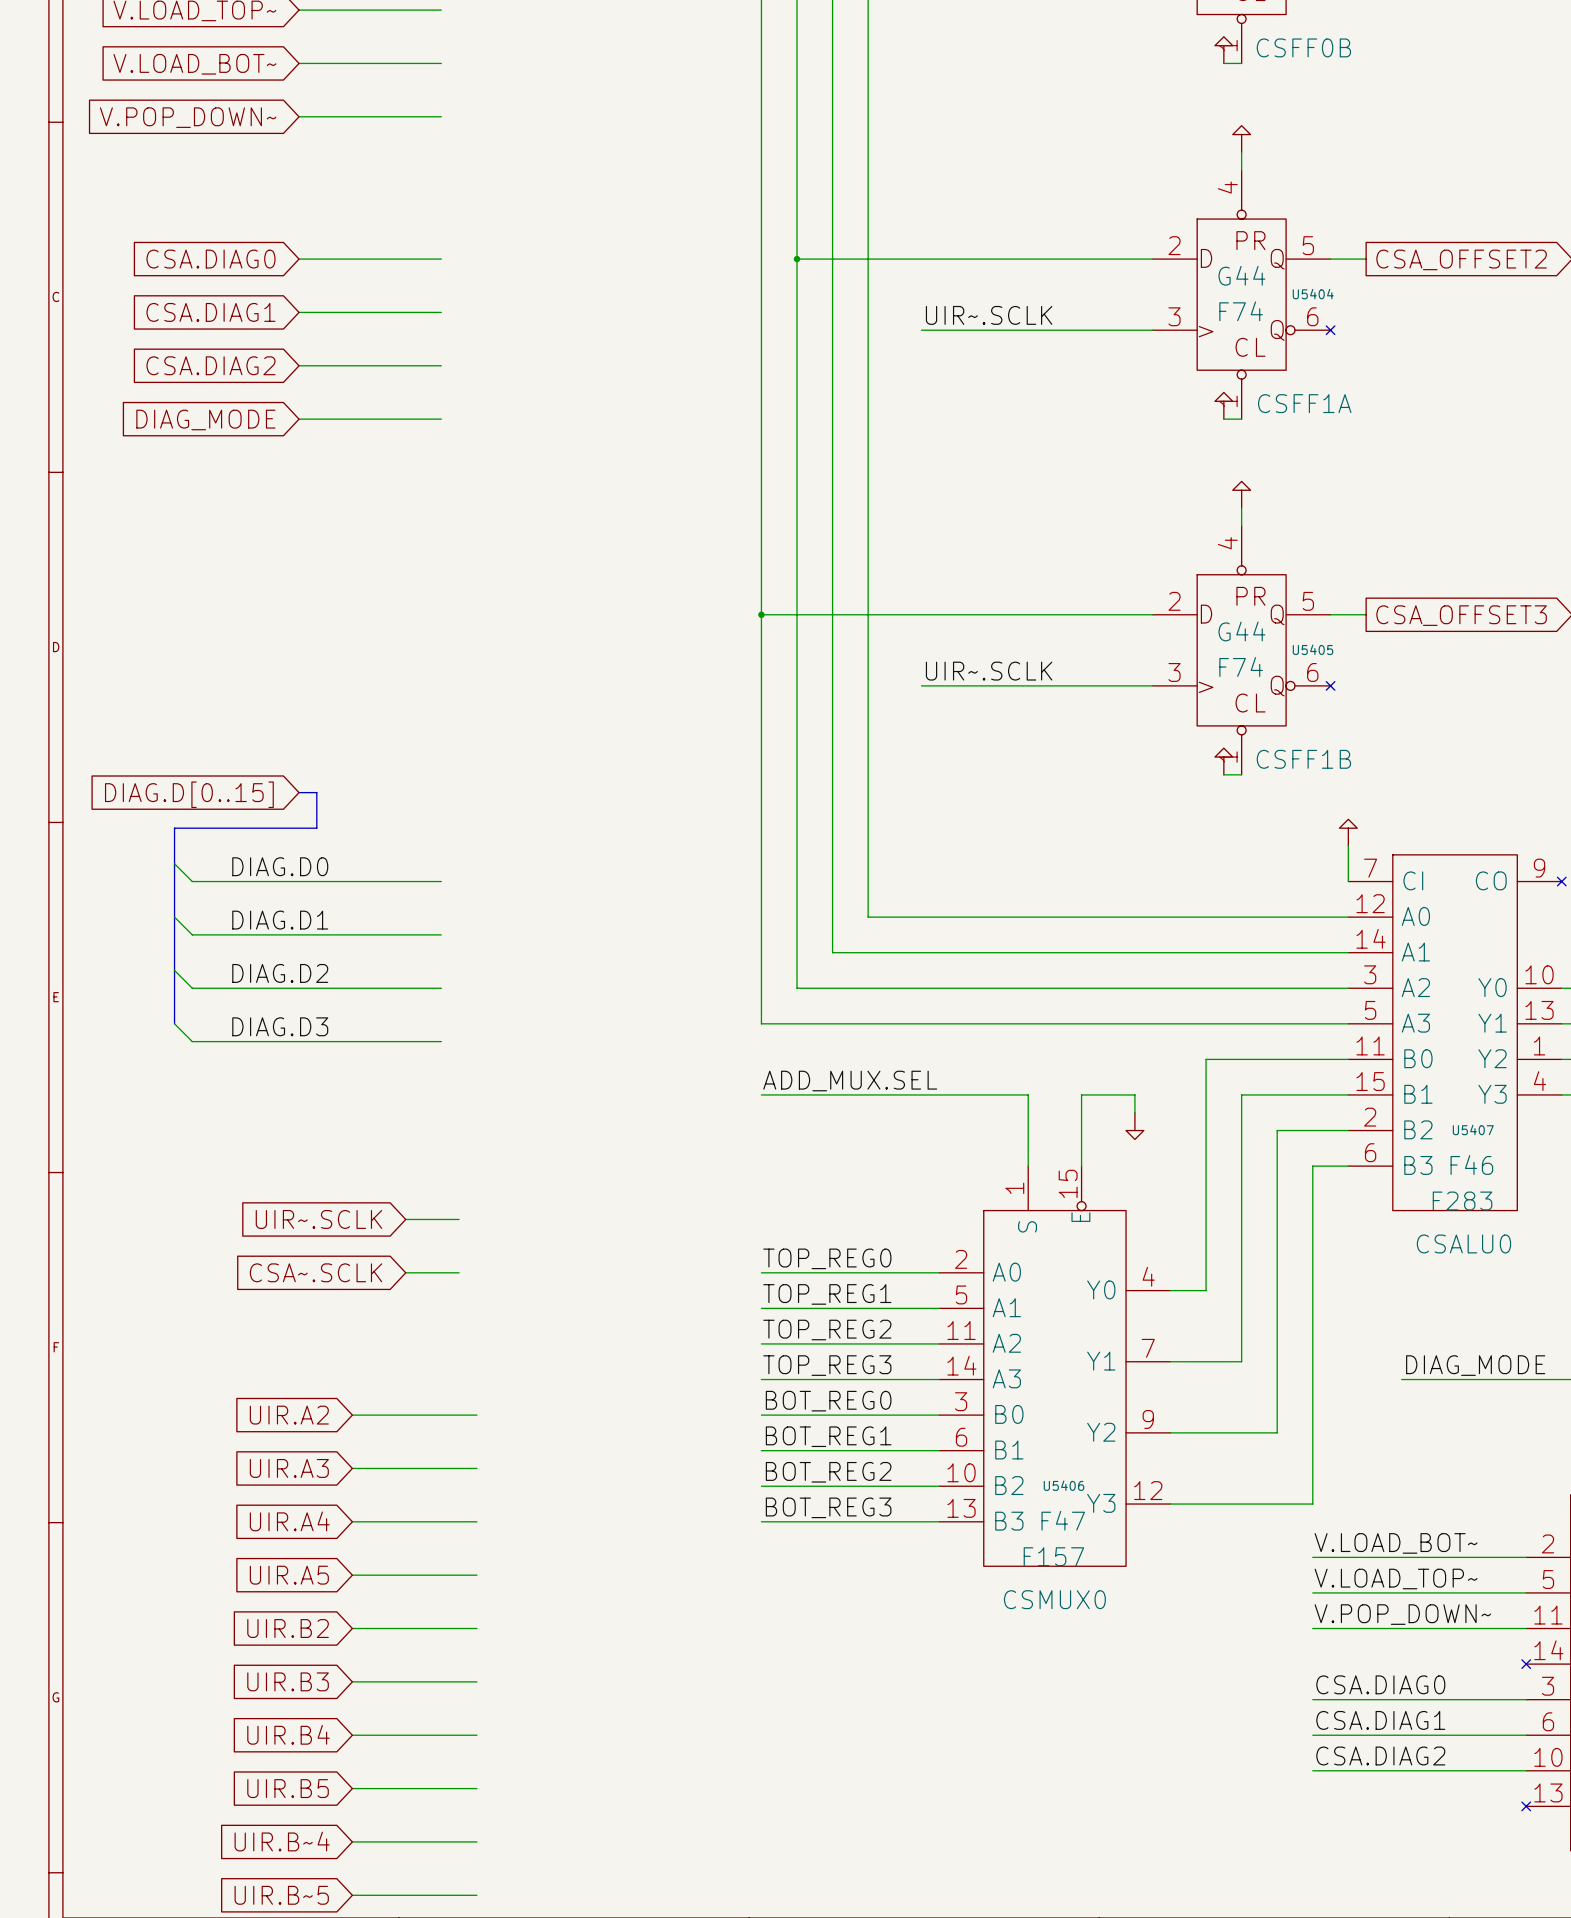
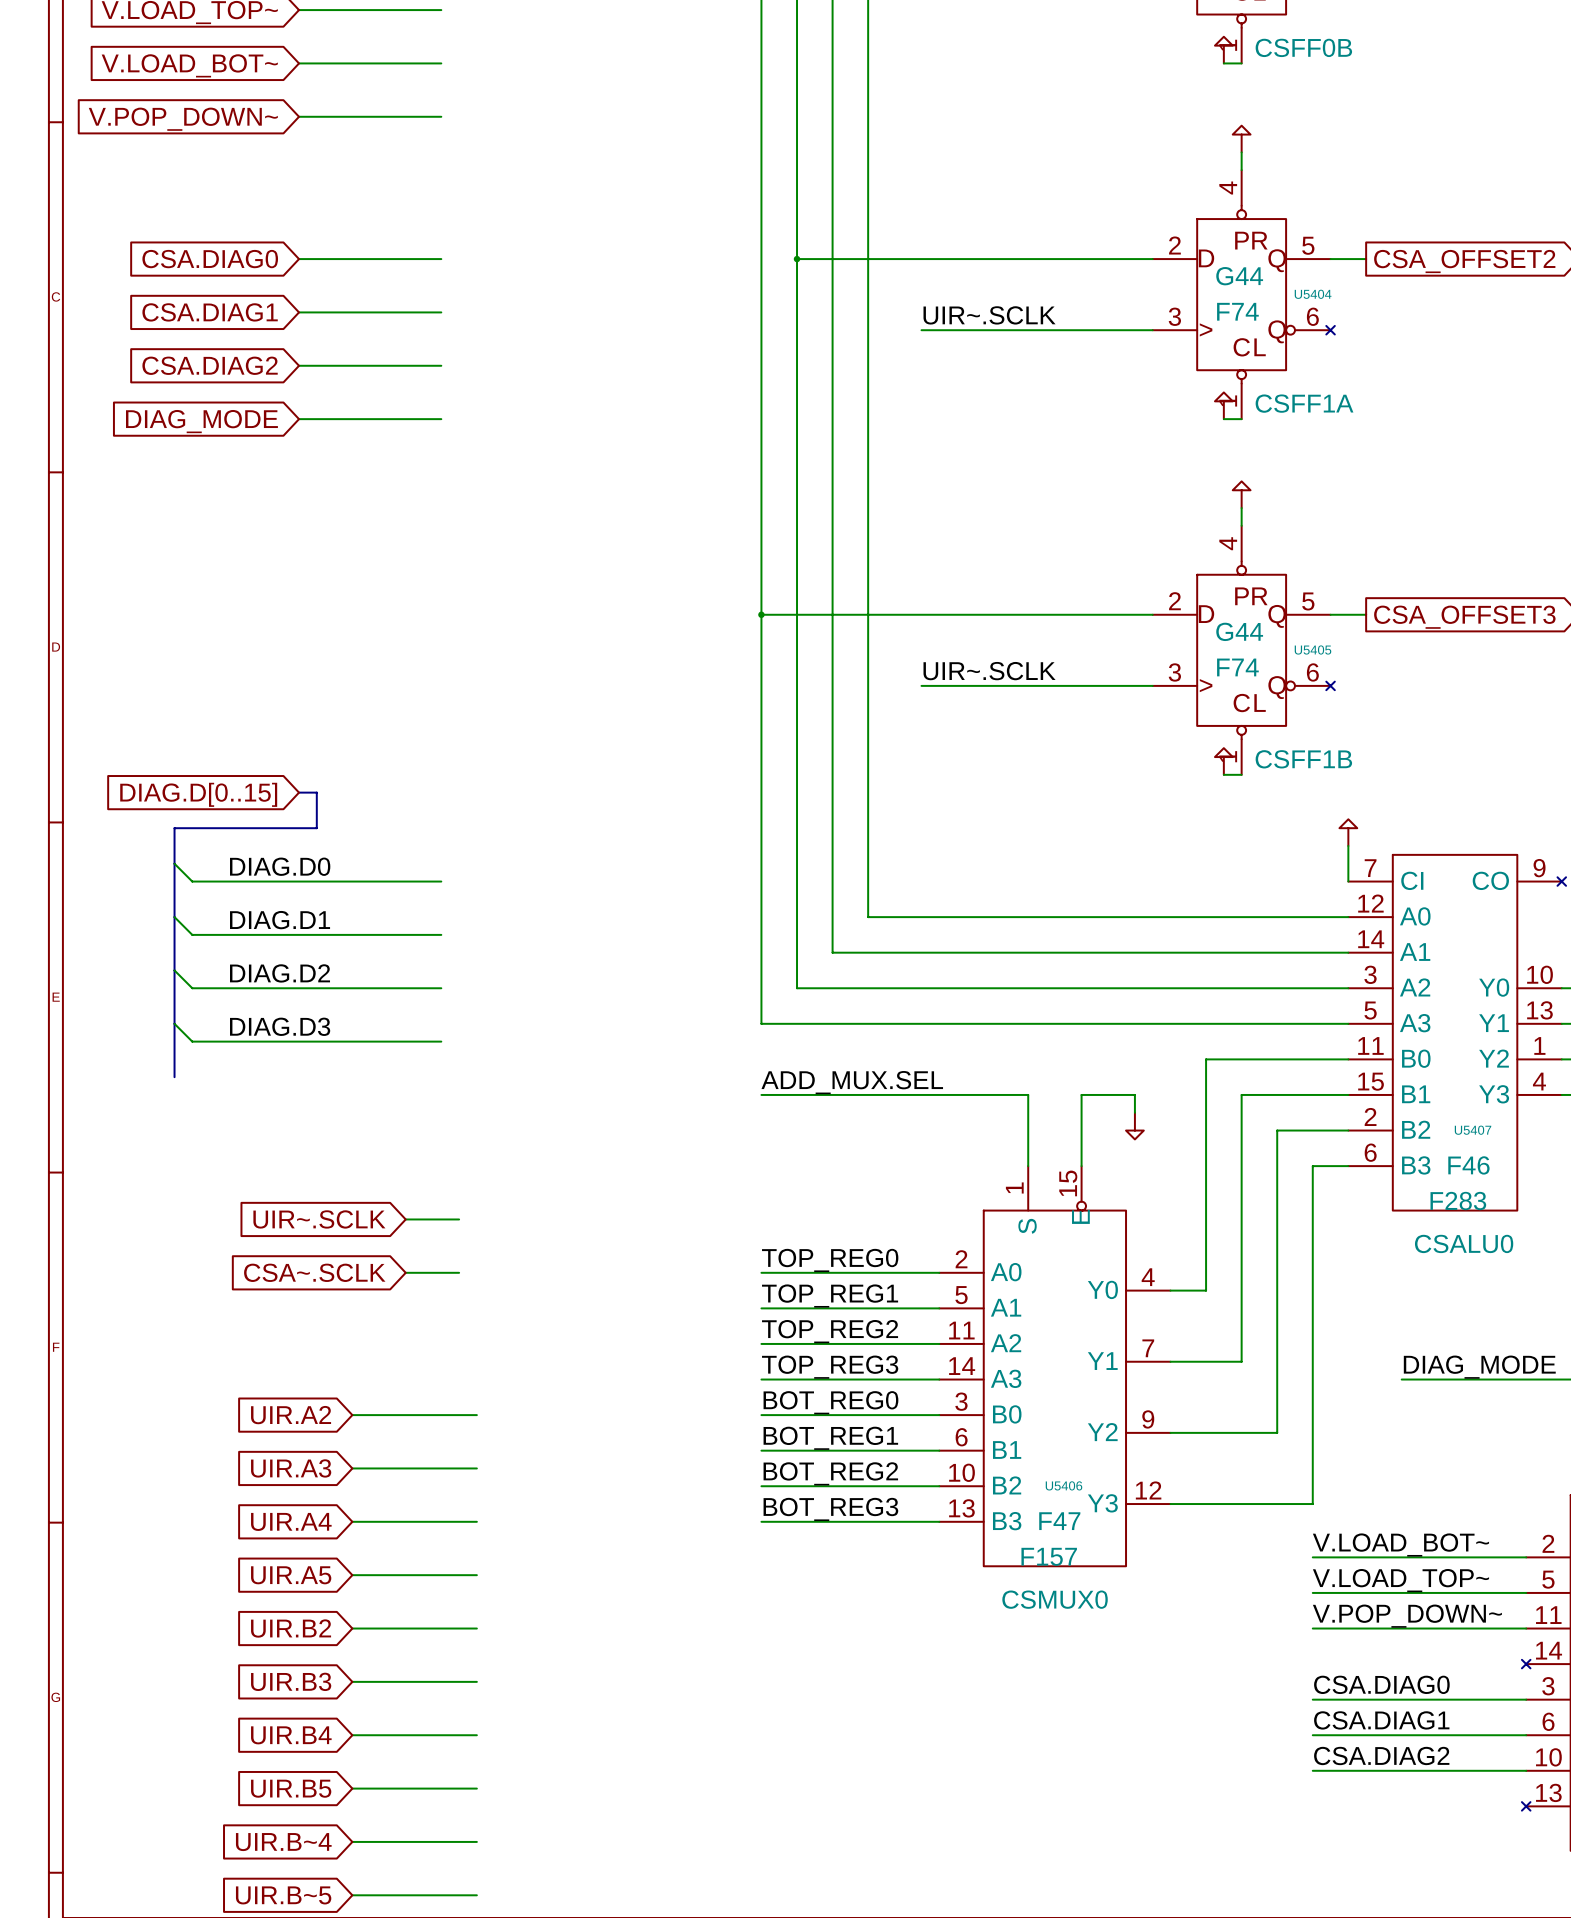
bus: none -> (174, 1023) (174, 1077)

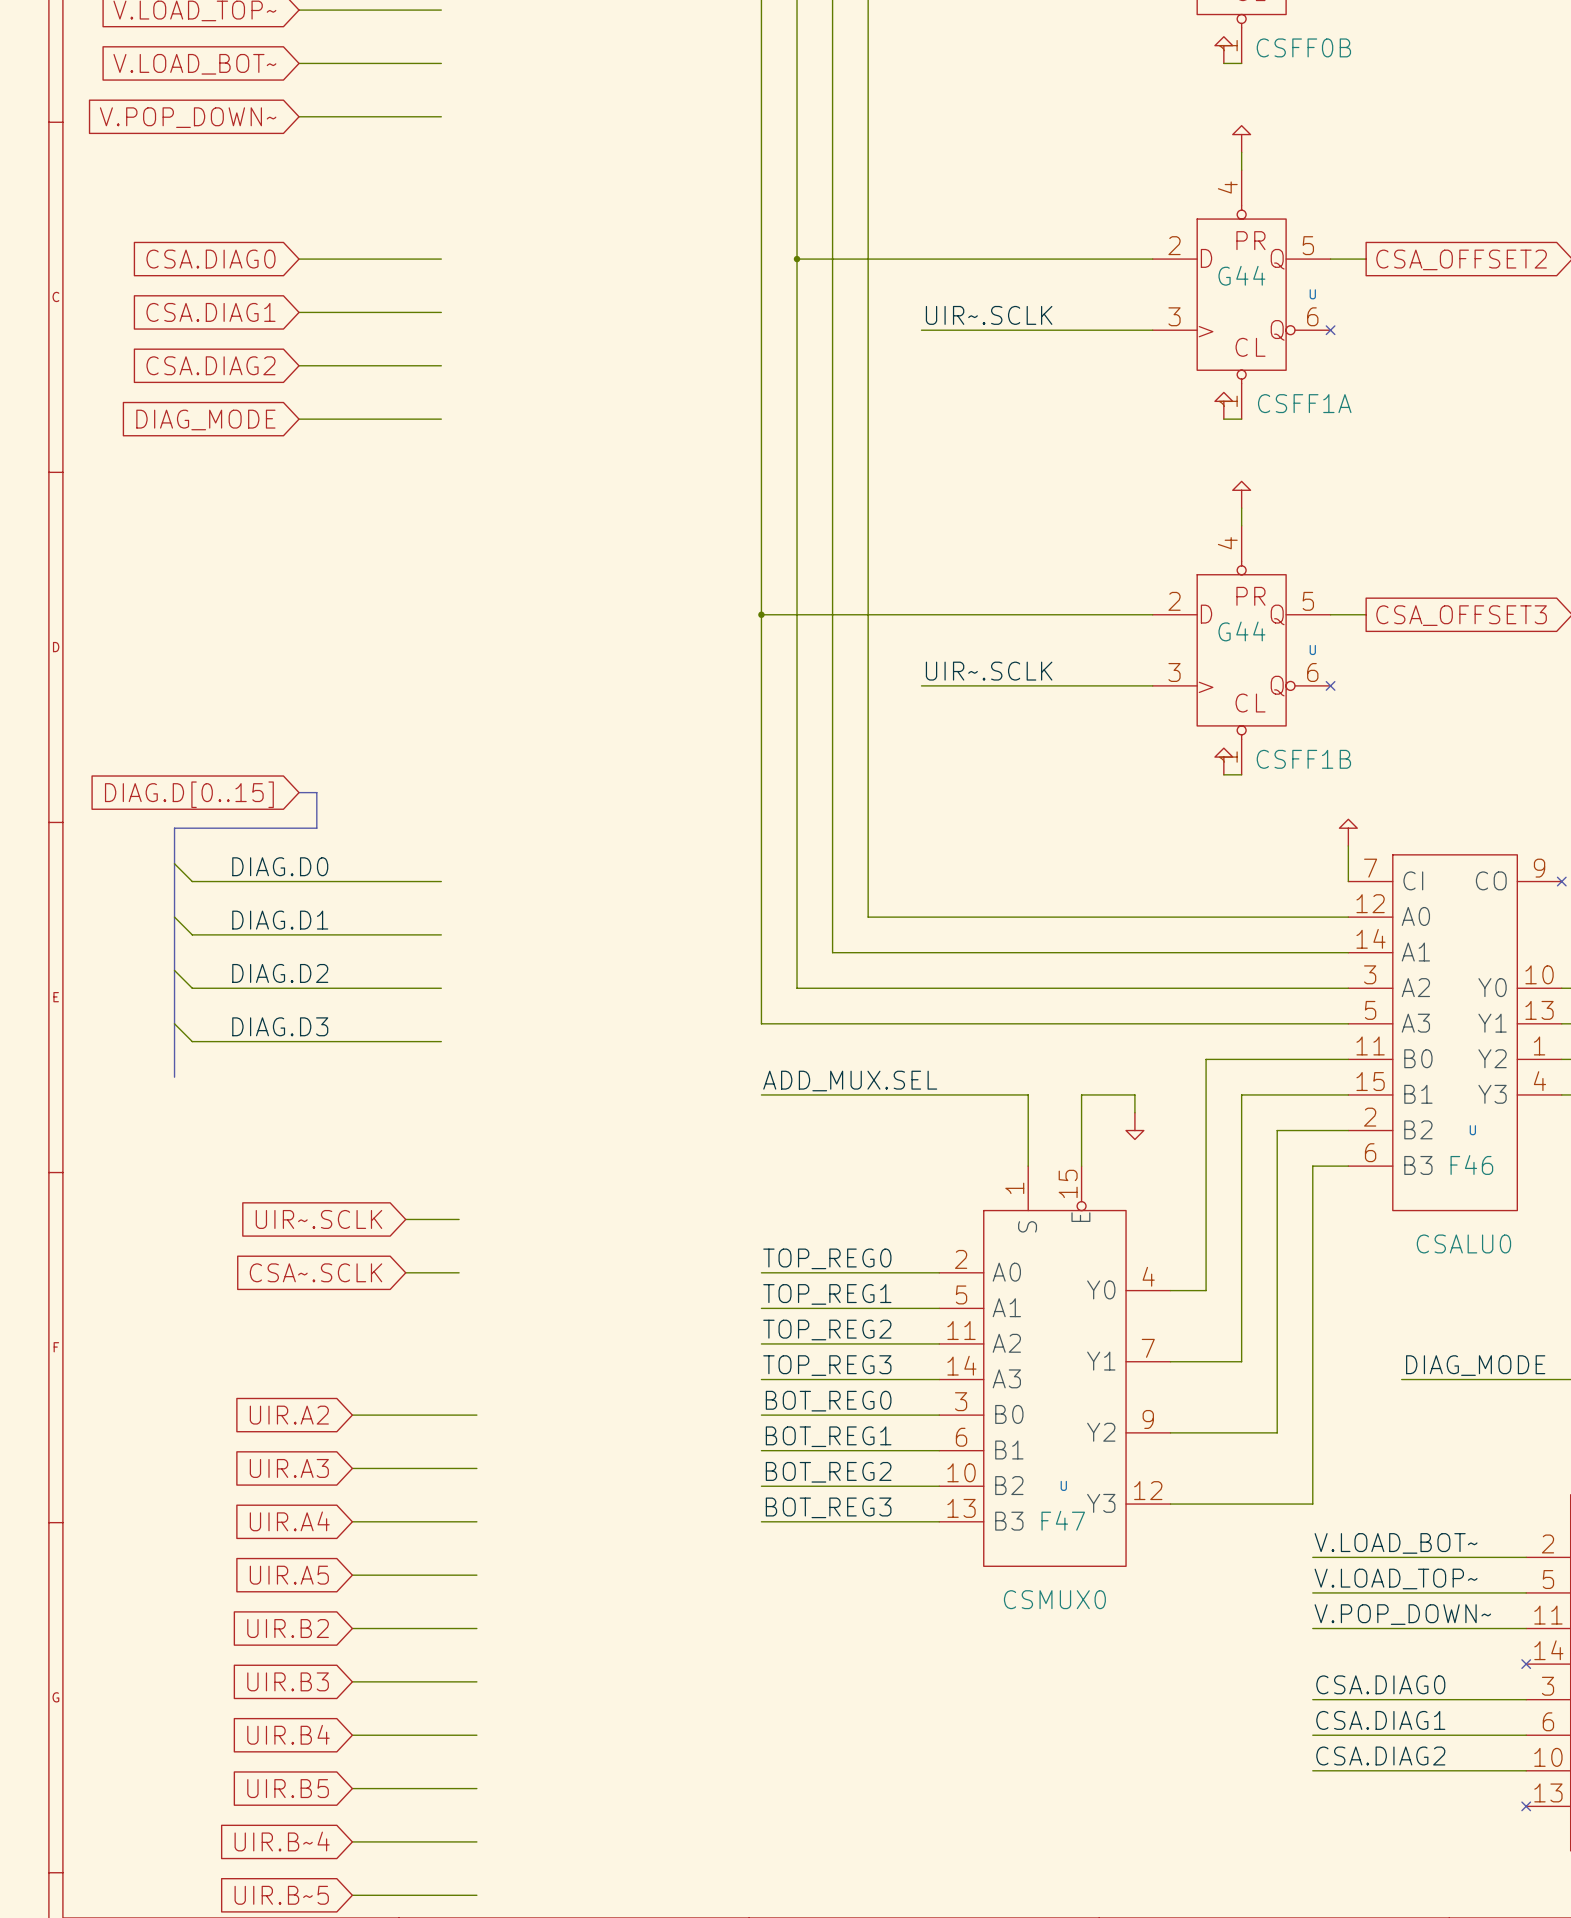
U5404 name: U5404 (1313, 294) -> U (1312, 294)
U5404 value: F74 (1237, 311) -> none
U5405 name: U5405 (1313, 650) -> U (1312, 650)
U5405 value: F74 (1237, 667) -> none
U5407 name: U5407 (1473, 1130) -> U (1472, 1130)
U5407 value: F283 (1458, 1201) -> none
U5406 name: U5406 (1064, 1485) -> U (1063, 1485)
U5406 value: F157 (1049, 1556) -> none

